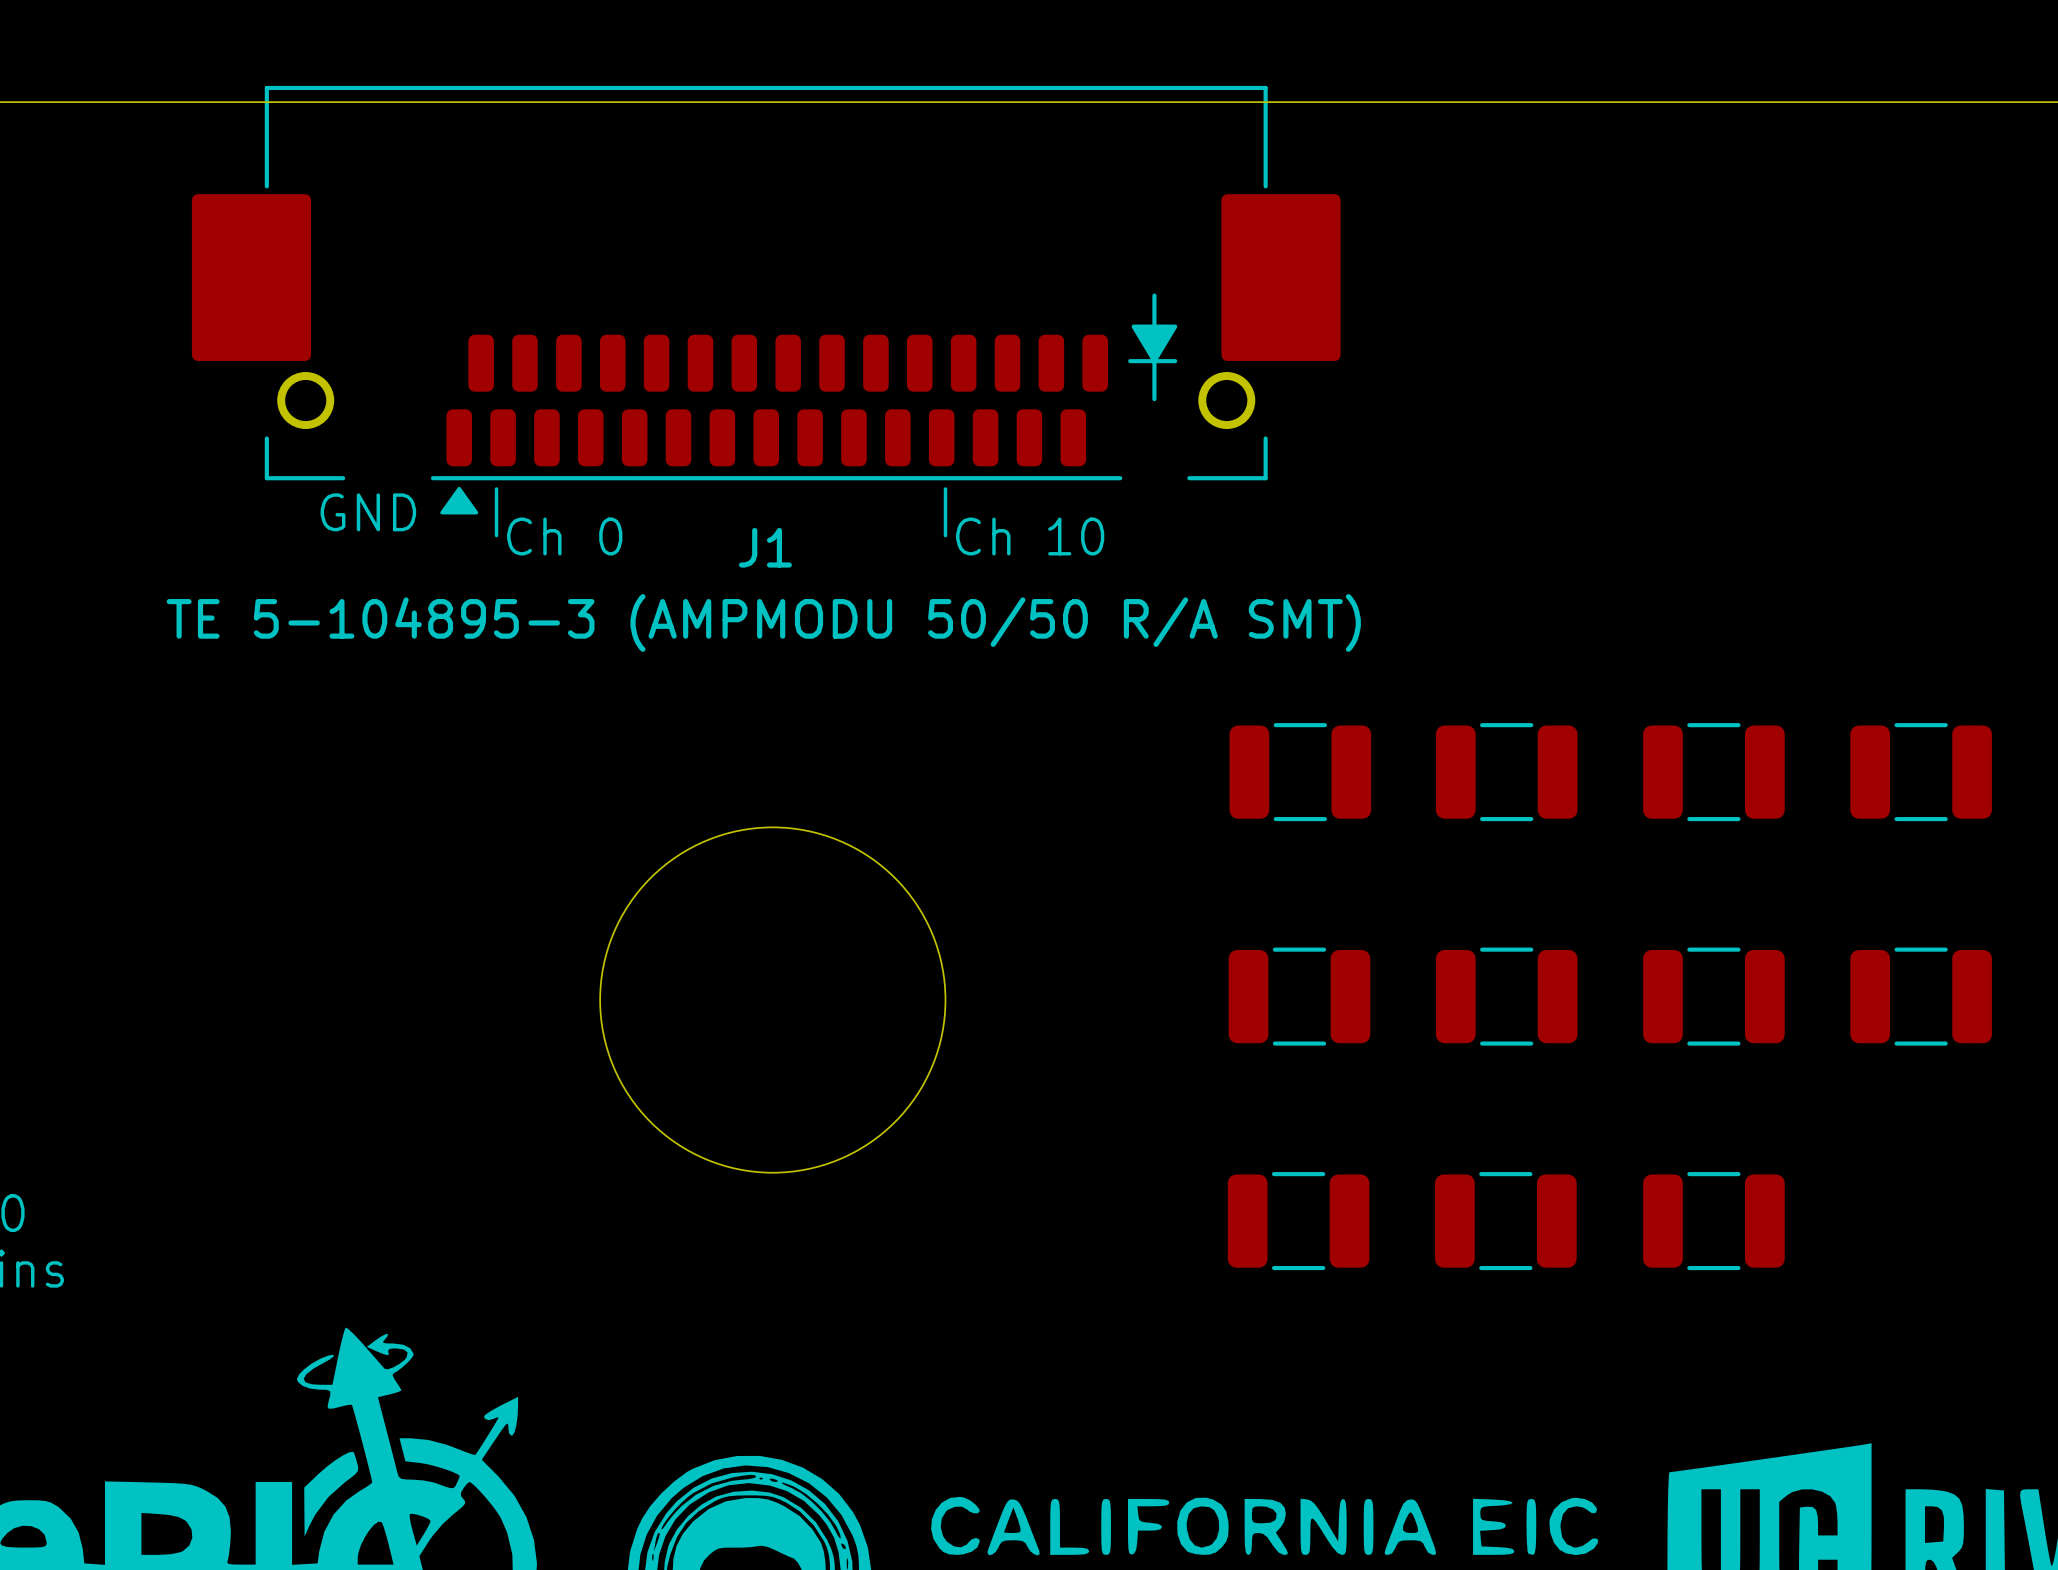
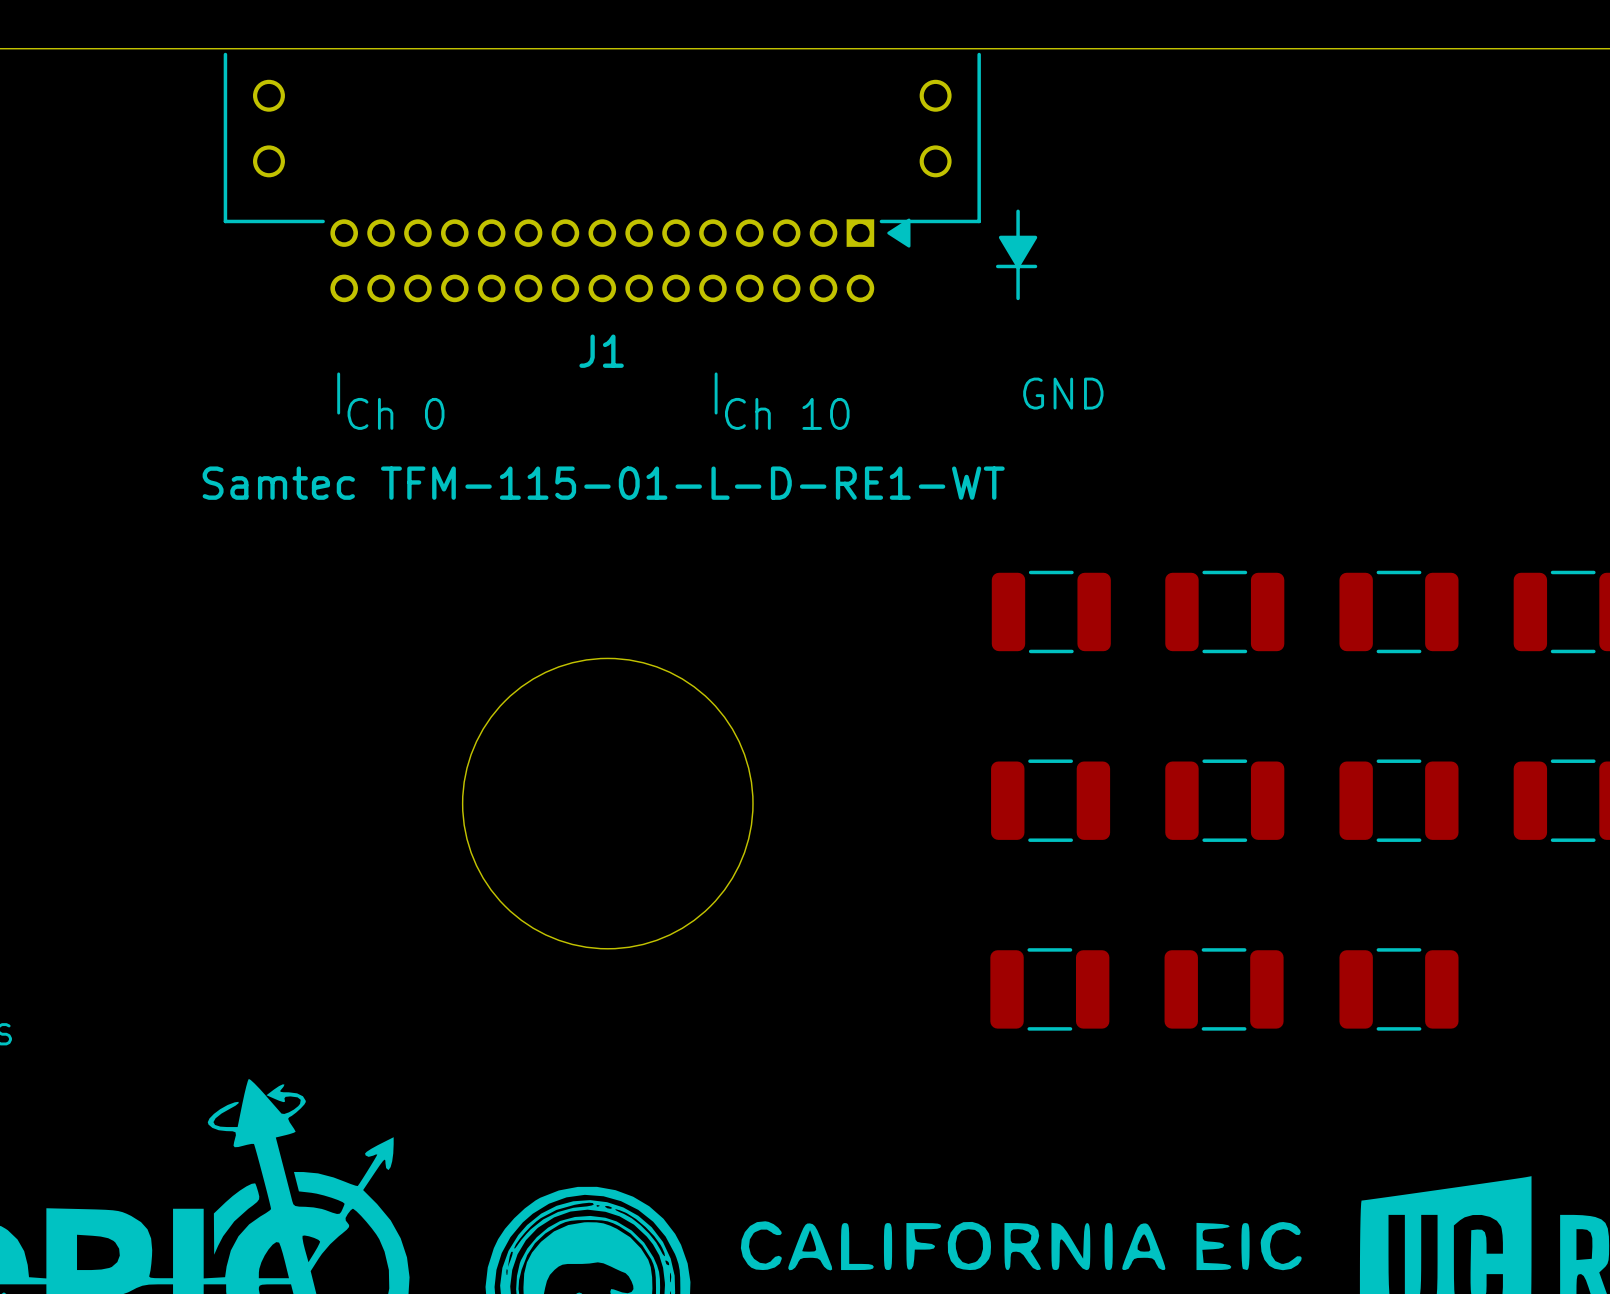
J1 footprint: [191, 85, 1341, 515] -> [223, 52, 981, 303]
drawing position: (1152, 347) -> (1016, 254)
line: (496, 488) (496, 535) -> (338, 373) (338, 413)
line: (945, 488) (945, 535) -> (716, 373) (716, 413)
text: GND (368, 512) -> none
text: none -> GND (1063, 393)
text position: Ch 0 (564, 536) -> Ch 0 (396, 413)
text position: Ch 10 (1030, 536) -> Ch 10 (787, 413)
text: TE 5-104895-3 (AMPMODU 50/50 R/A SMT) (763, 622) -> Samtec TFM-115-01-L-D-RE1-WT (603, 483)

